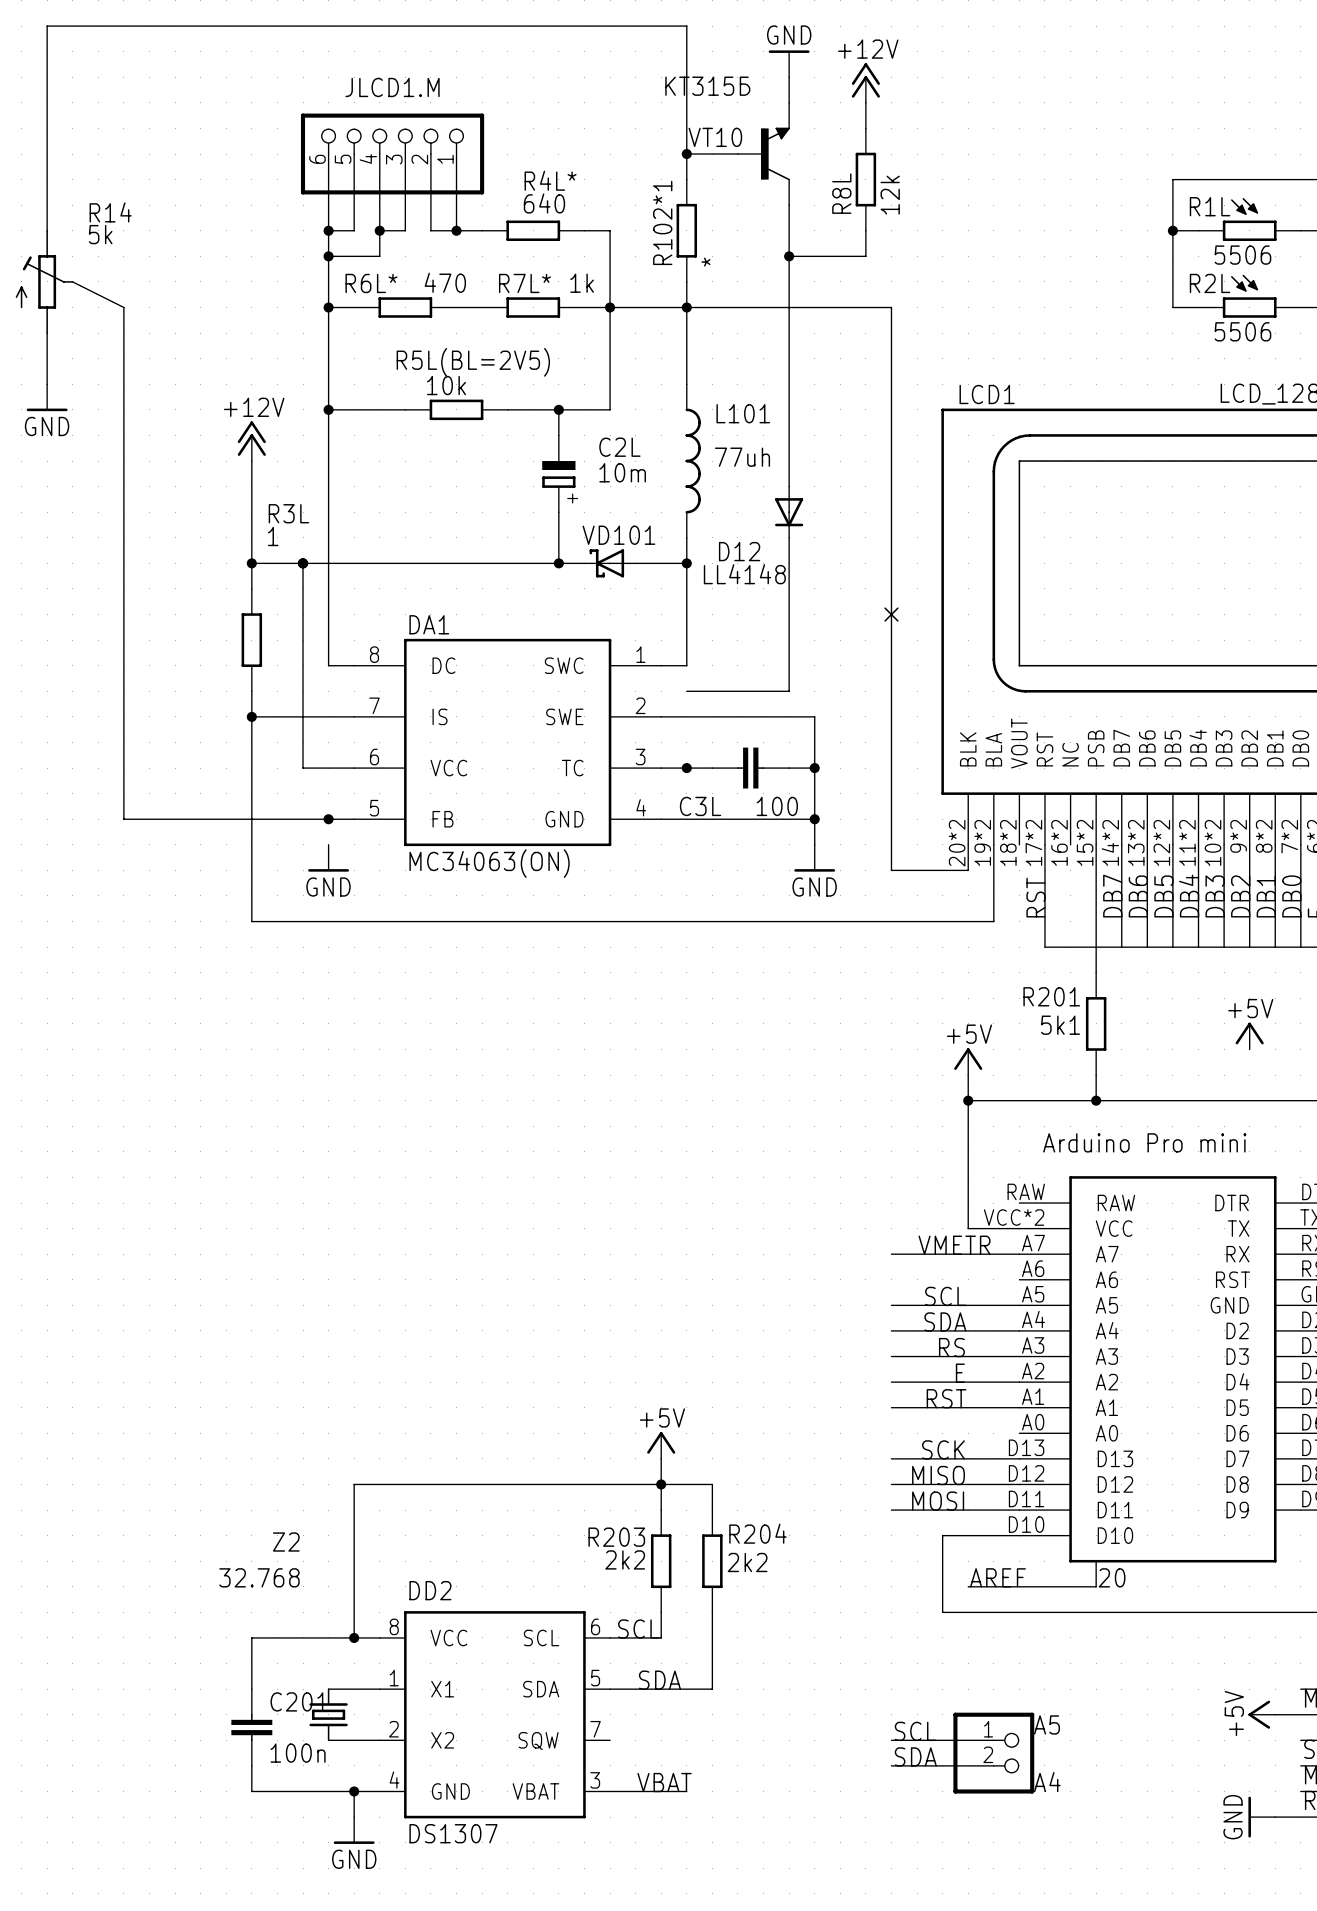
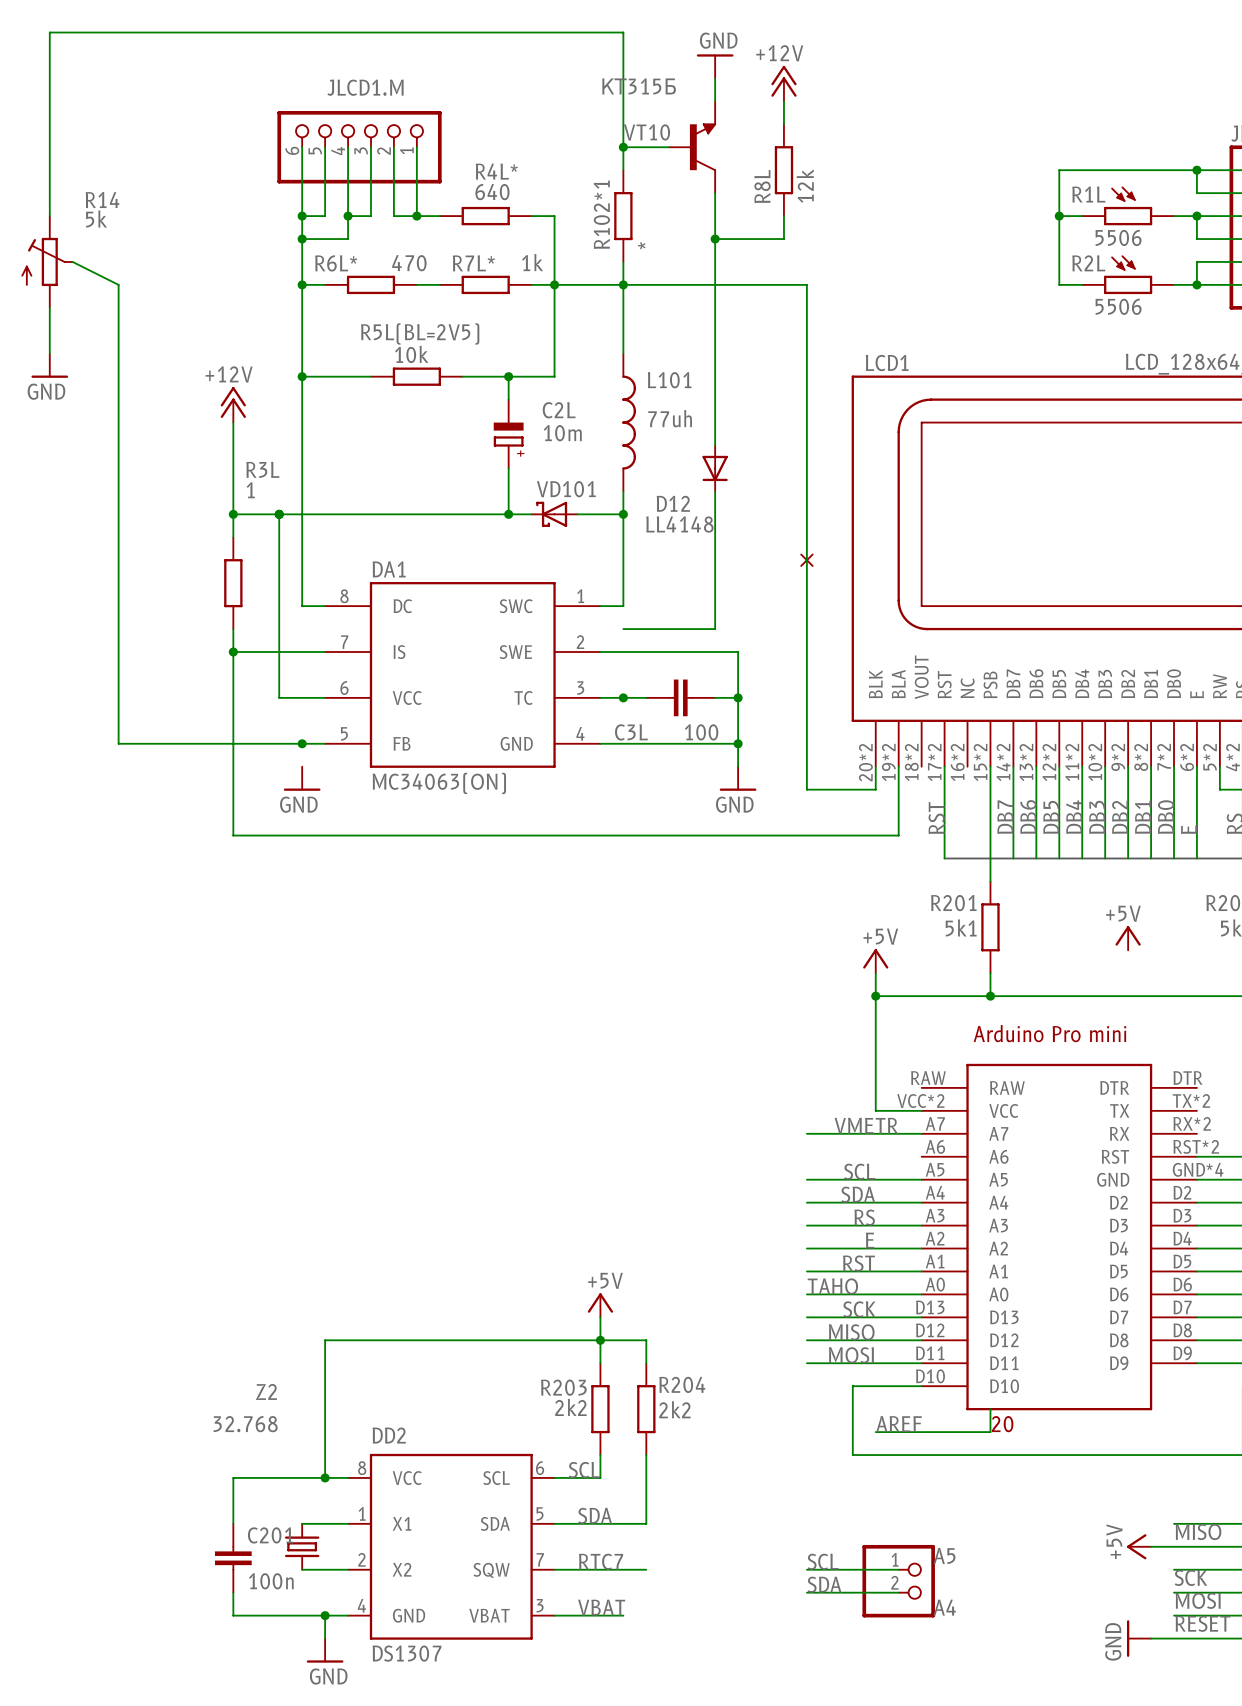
label: none -> TAHO (832, 1286)
wire: none -> (806, 1294) (921, 1294)
label: none -> RTC7 (601, 1561)
wire: none -> (554, 1569) (646, 1569)

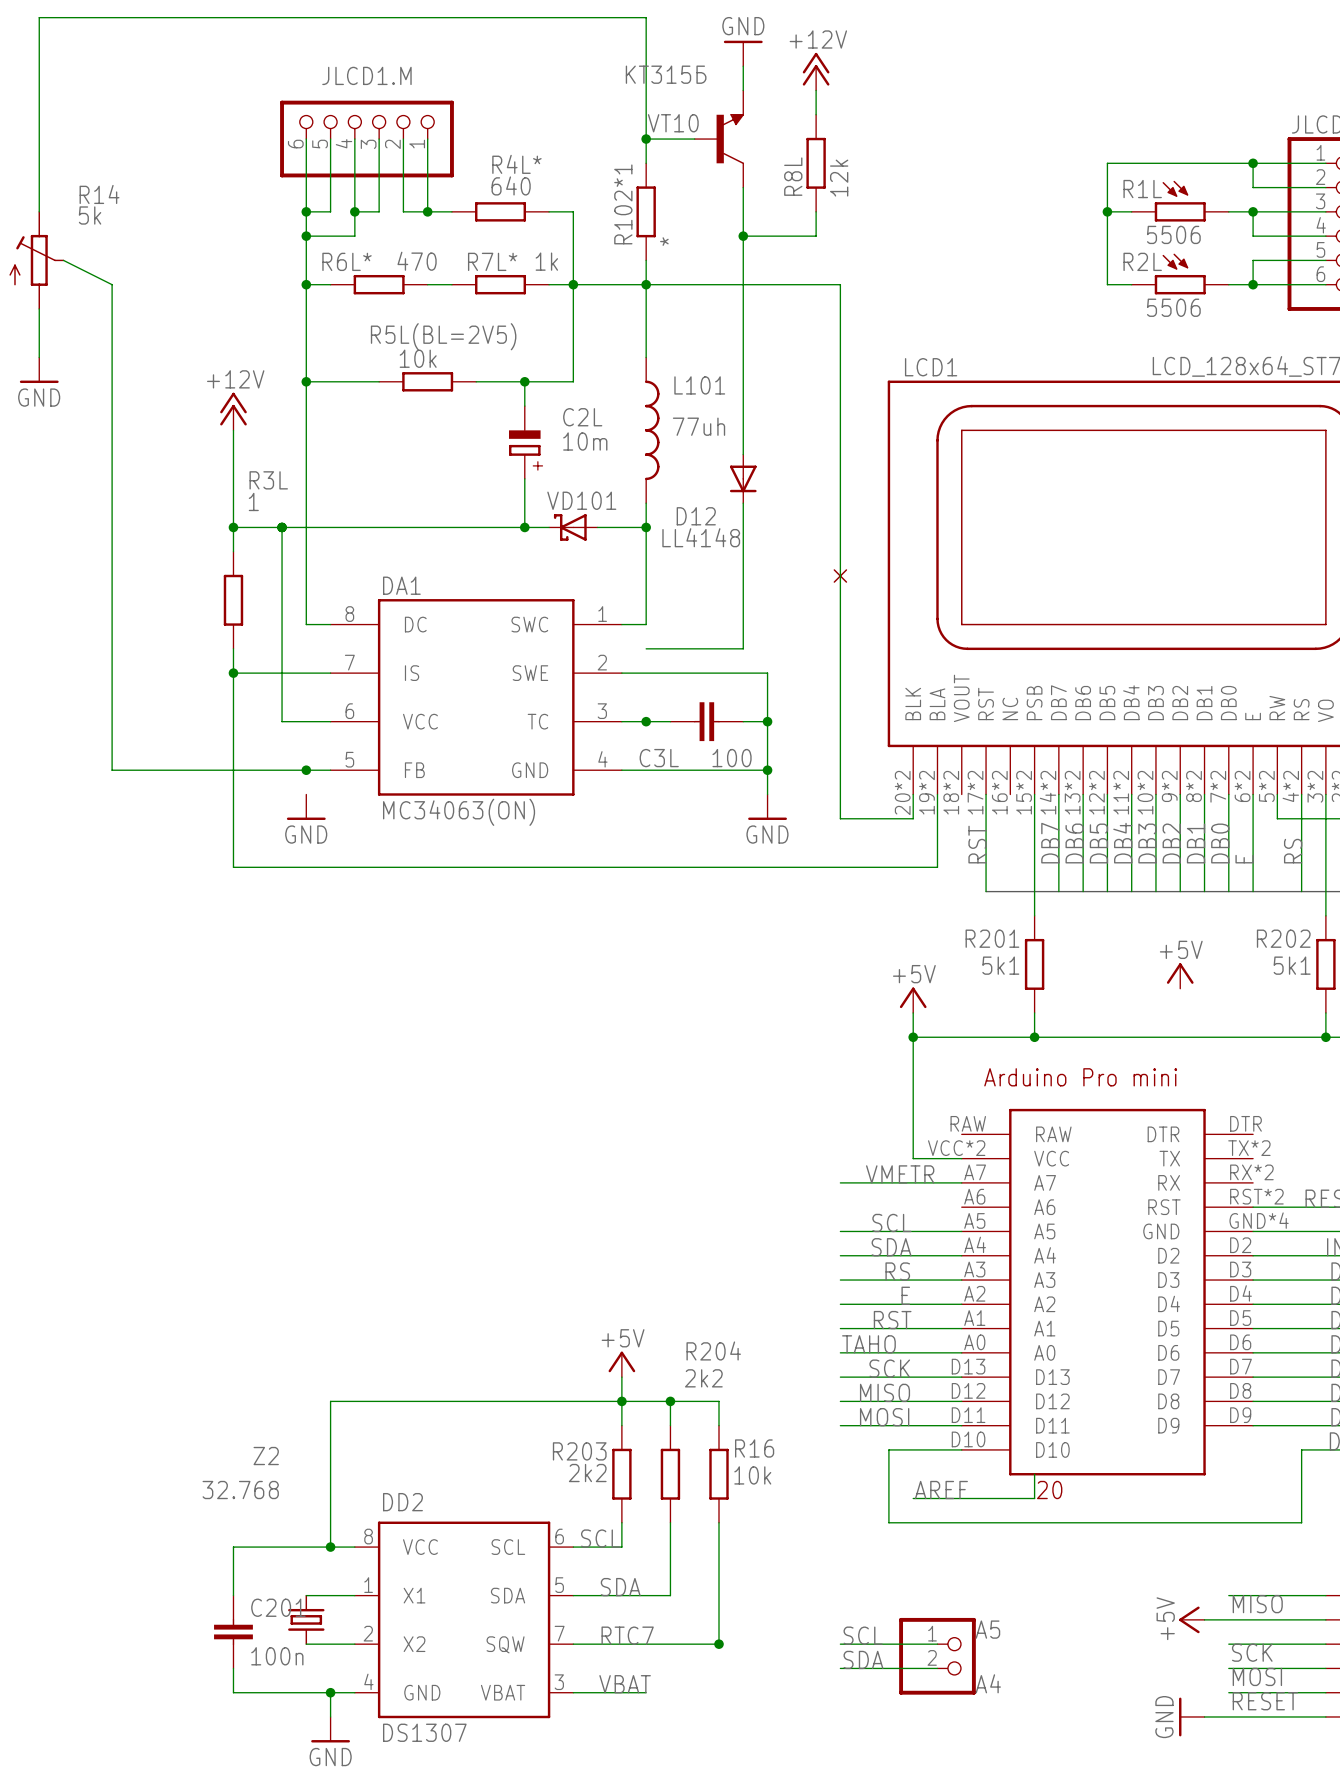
wire: none -> (670, 1401) (719, 1401) (719, 1425)
junction: none -> (670, 1401)
R204 name position: R204 (682, 1384) -> R204 (713, 1350)
R204 value position: 2k2 (674, 1409) -> 2k2 (703, 1378)
R16: none -> 10k (719, 1474)
wire: none -> (719, 1522) (719, 1644) (670, 1644)
junction: none -> (719, 1644)

